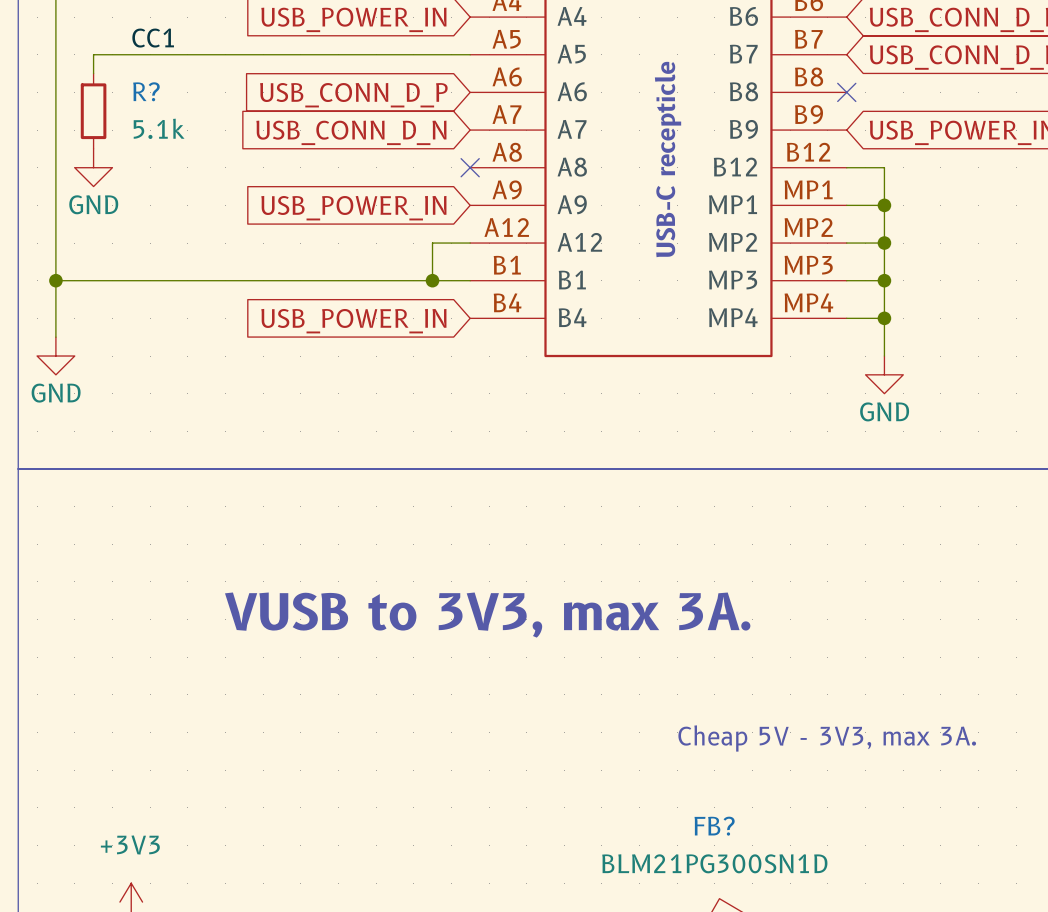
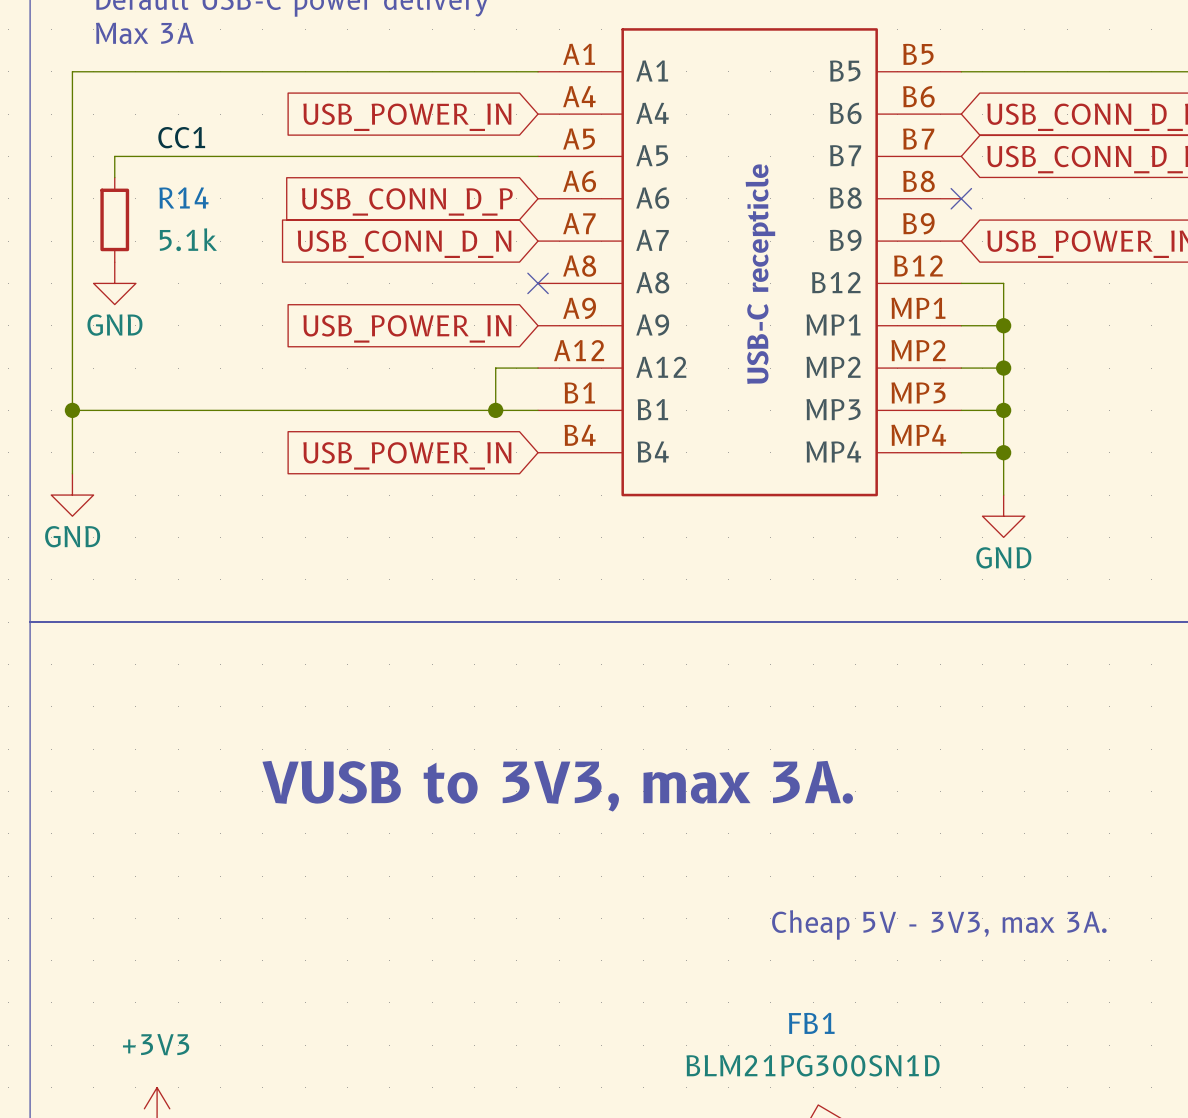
R? name: R? (146, 91) -> R14 (183, 197)
FB? name: FB? (714, 826) -> FB1 (811, 1023)

